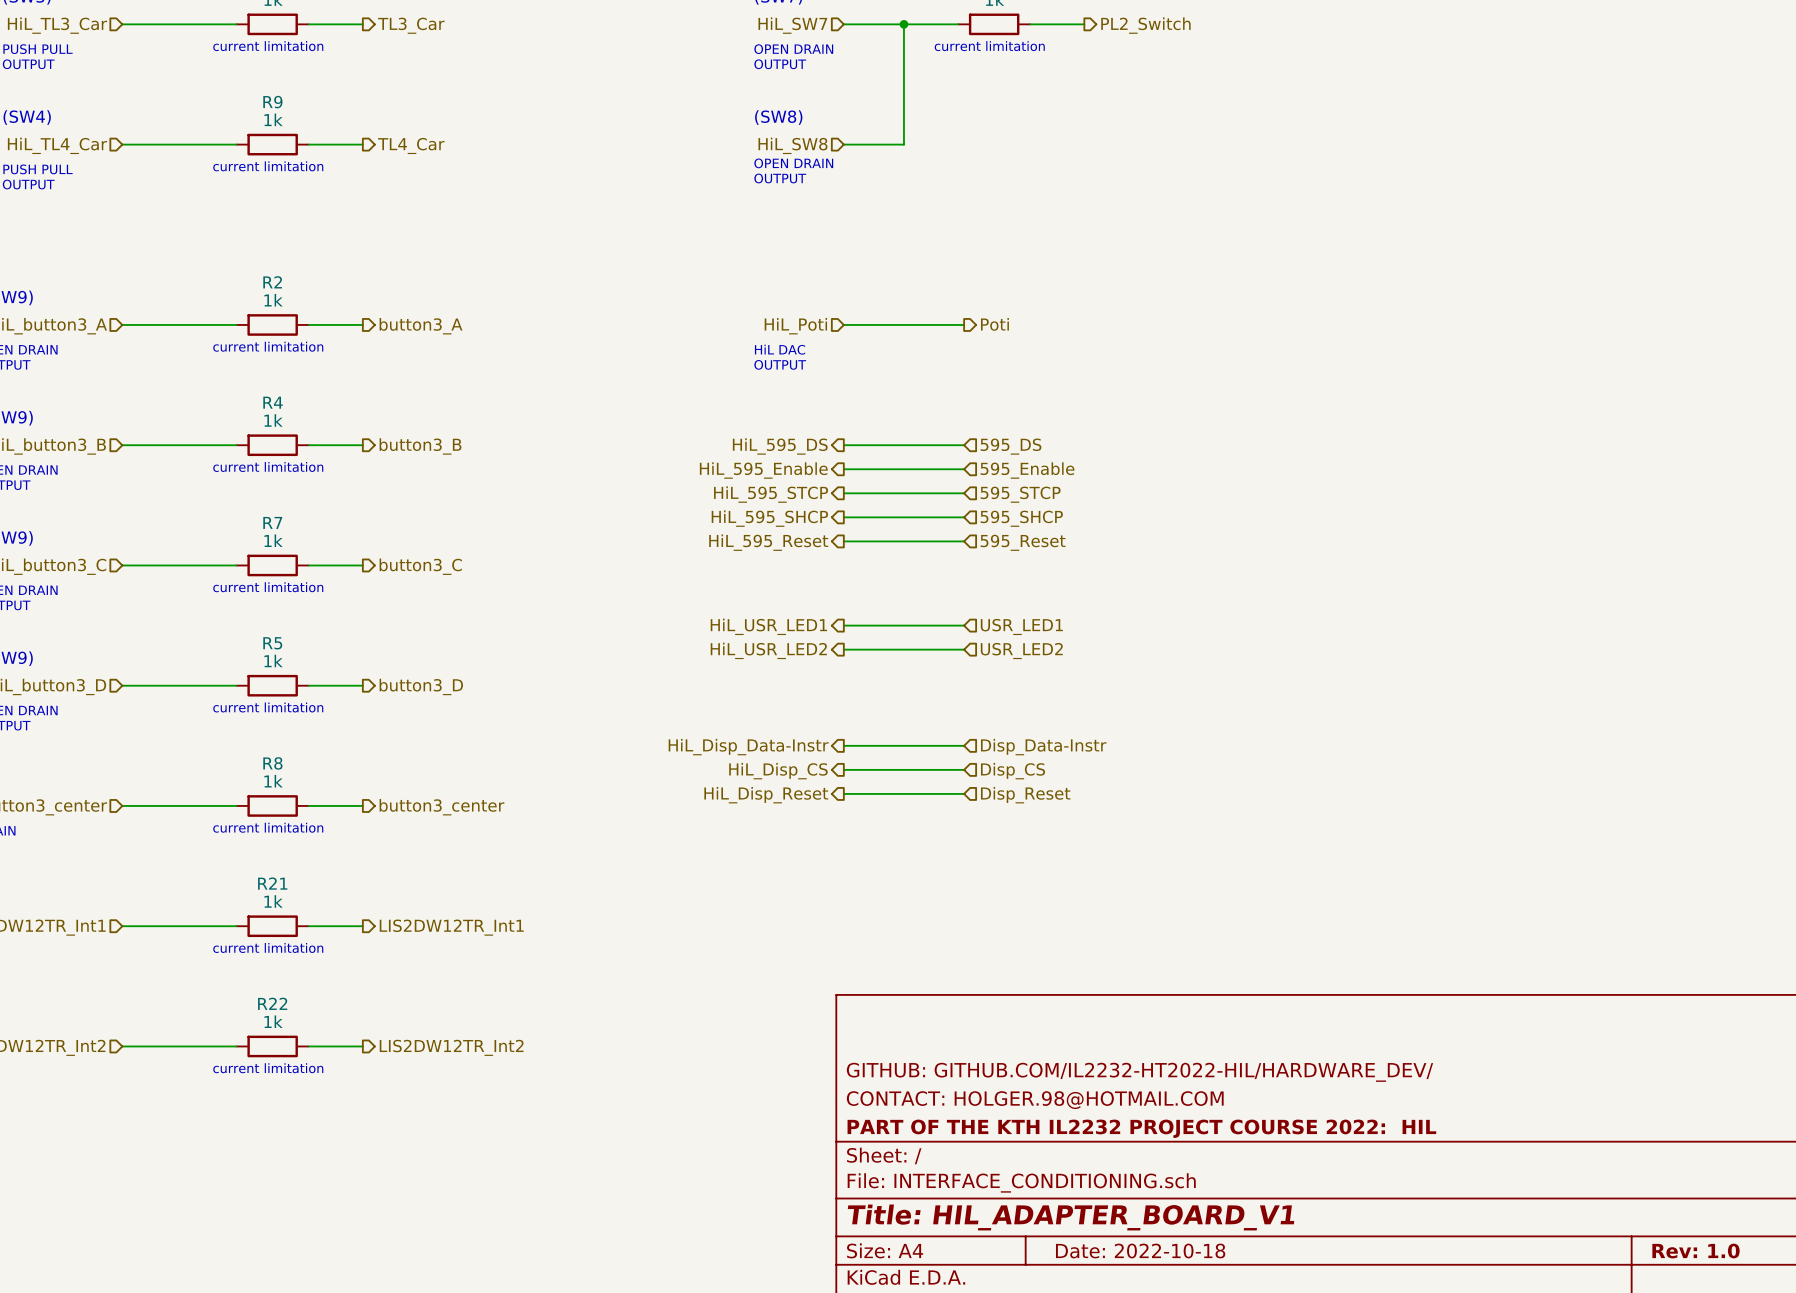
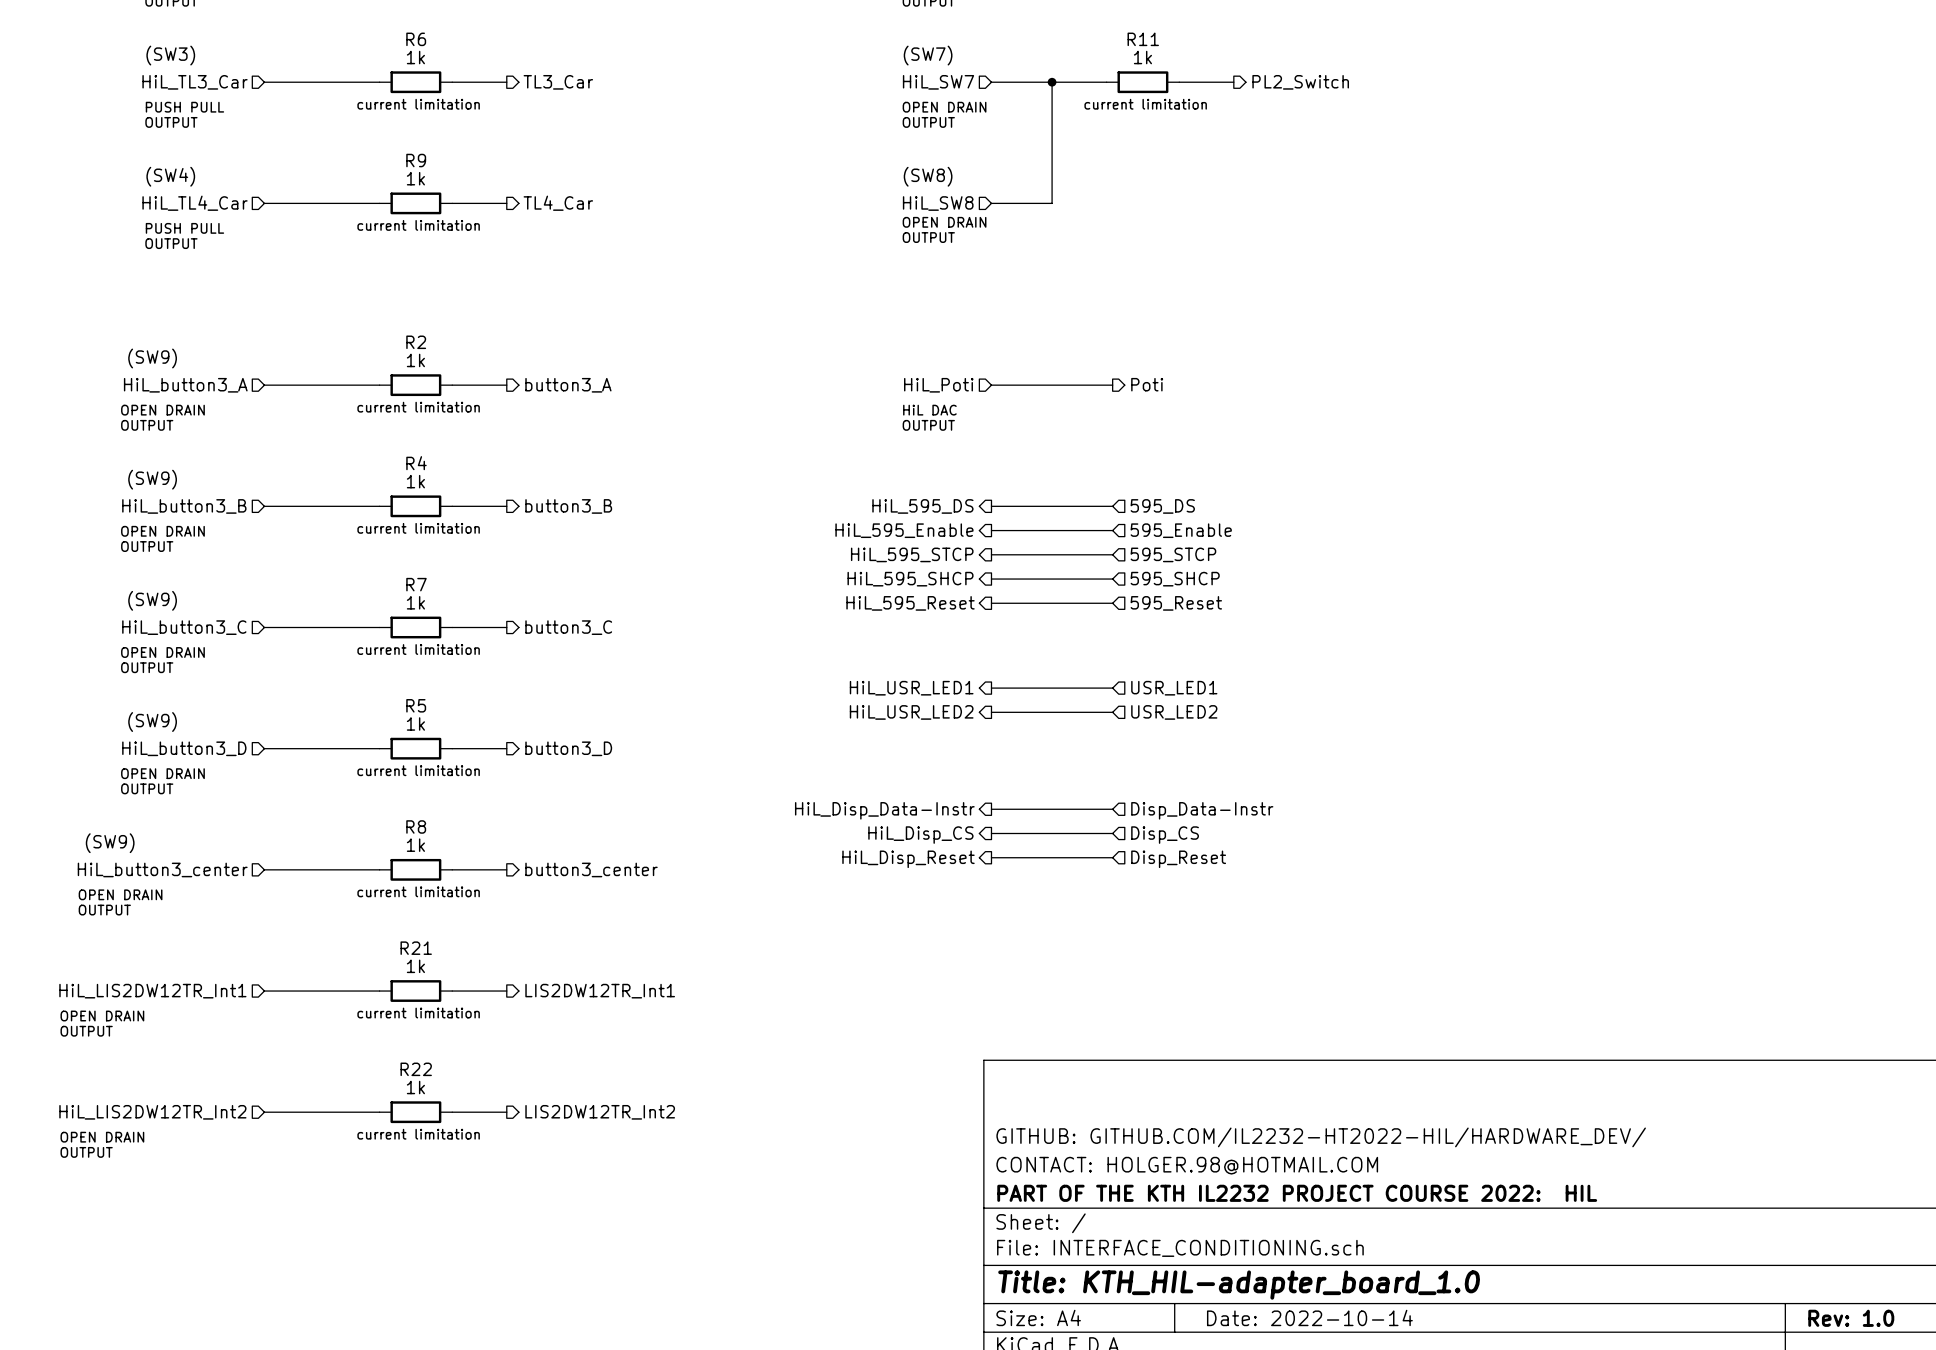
title block: Title: HIL_ADAPTER_BOARD_V1 (1071, 1217) -> Title: KTH_HIL-adapter_board_1.0 (1239, 1285)
title block: Date: 2022-10-18 (1140, 1251) -> Date: 2022-10-14 (1309, 1317)

